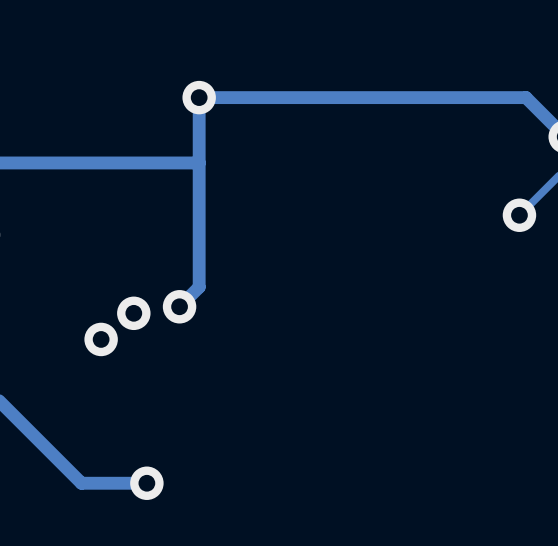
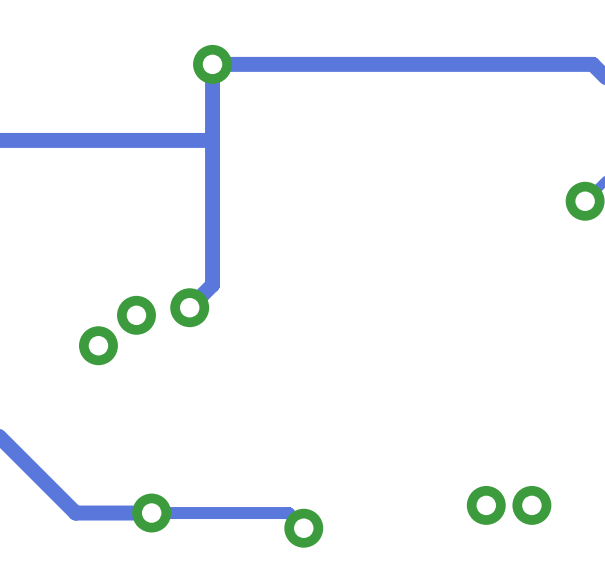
via: none -> (486, 505)
via: none -> (531, 505)
track: none -> (151, 513) (288, 513) (303, 528)
via: none -> (303, 528)

